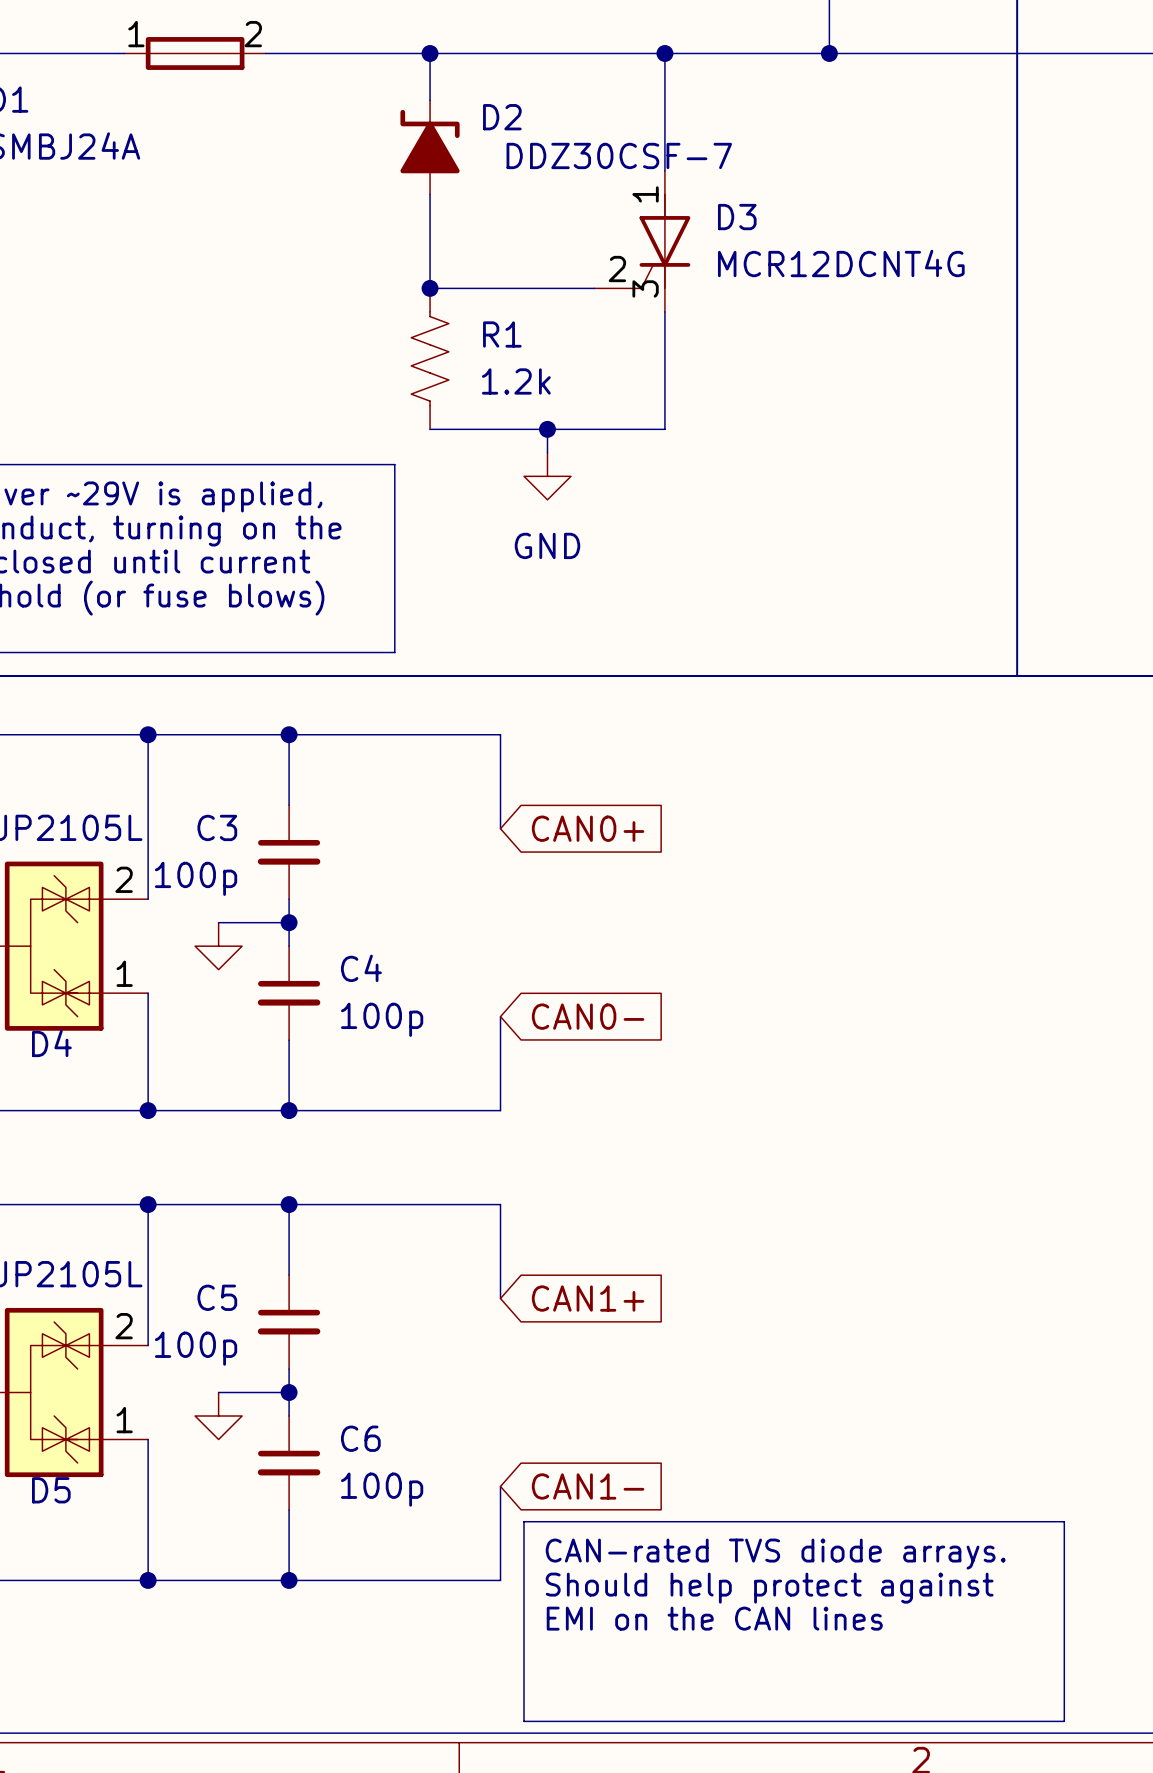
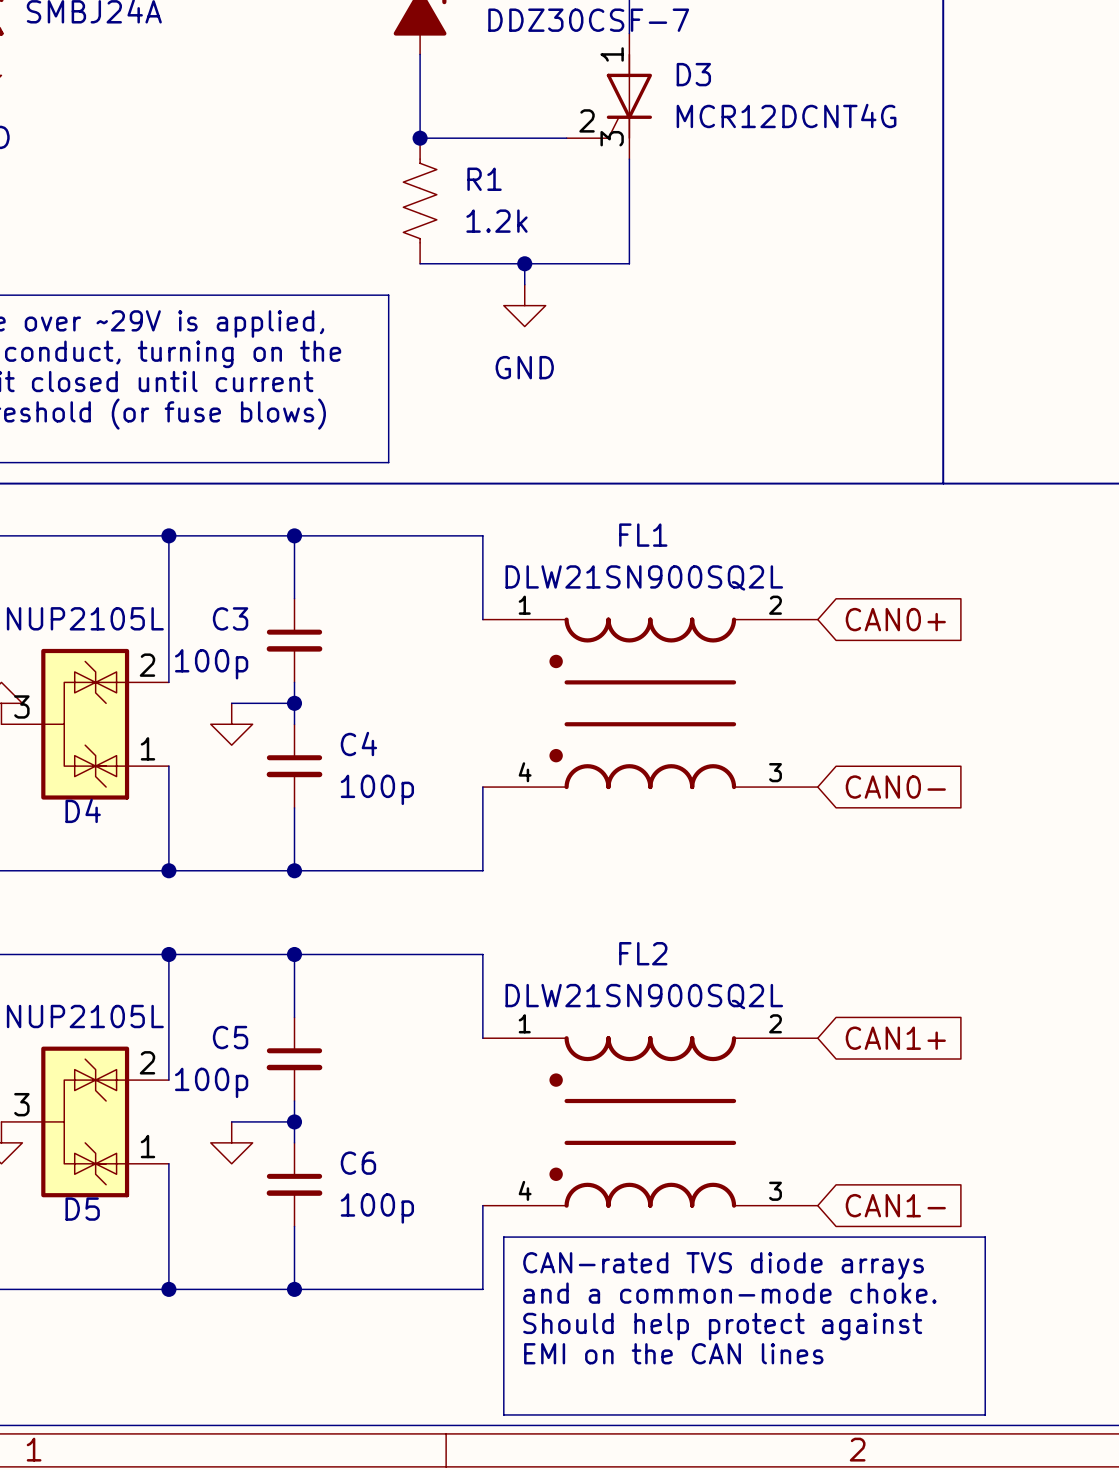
global label position: CAN0+ (588, 828) -> CAN0+ (895, 619)
FL1: none -> DLW21SN900SQ2L (650, 703)
global label position: CAN0- (588, 1016) -> CAN0- (895, 787)
global label position: CAN1+ (588, 1298) -> CAN1+ (895, 1038)
FL2: none -> DLW21SN900SQ2L (650, 1121)
global label position: CAN1- (588, 1486) -> CAN1- (895, 1205)
text: CAN-rated TVS diode arrays. (775, 1554) -> CAN-rated TVS diode arrays (723, 1265)
text: Should help protect against (769, 1588) -> and a common-mode choke. (729, 1293)
text: EMI on the CAN lines (714, 1618) -> Should help protect against (722, 1326)
text: none -> EMI on the CAN lines (673, 1353)

